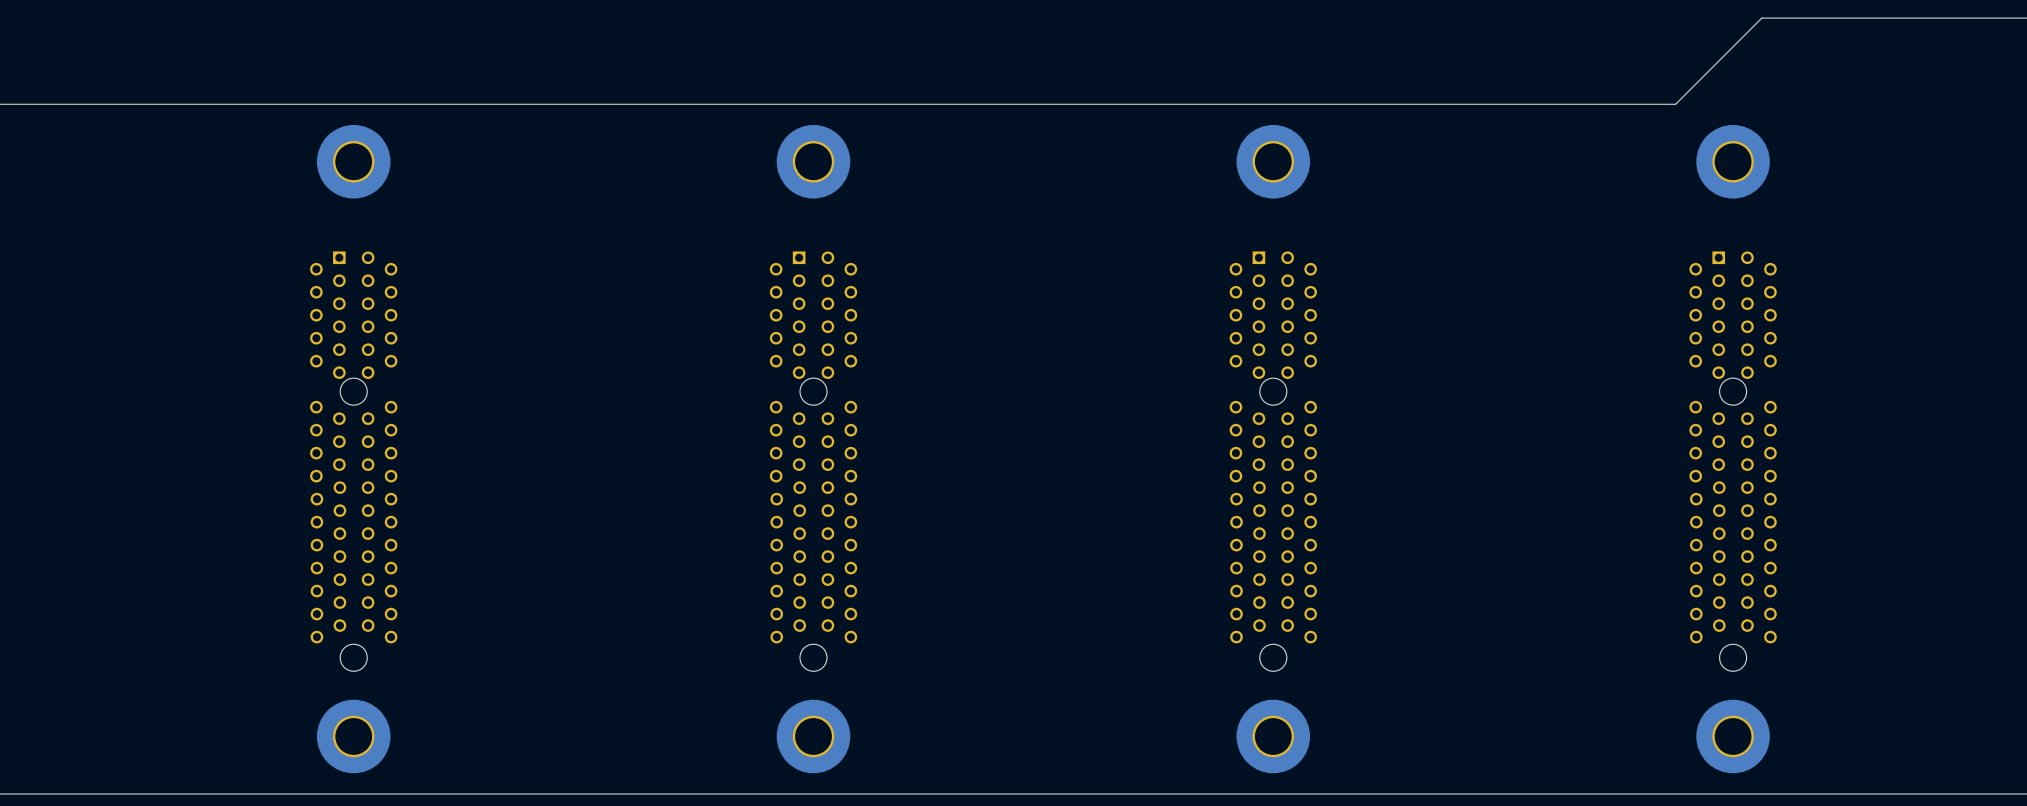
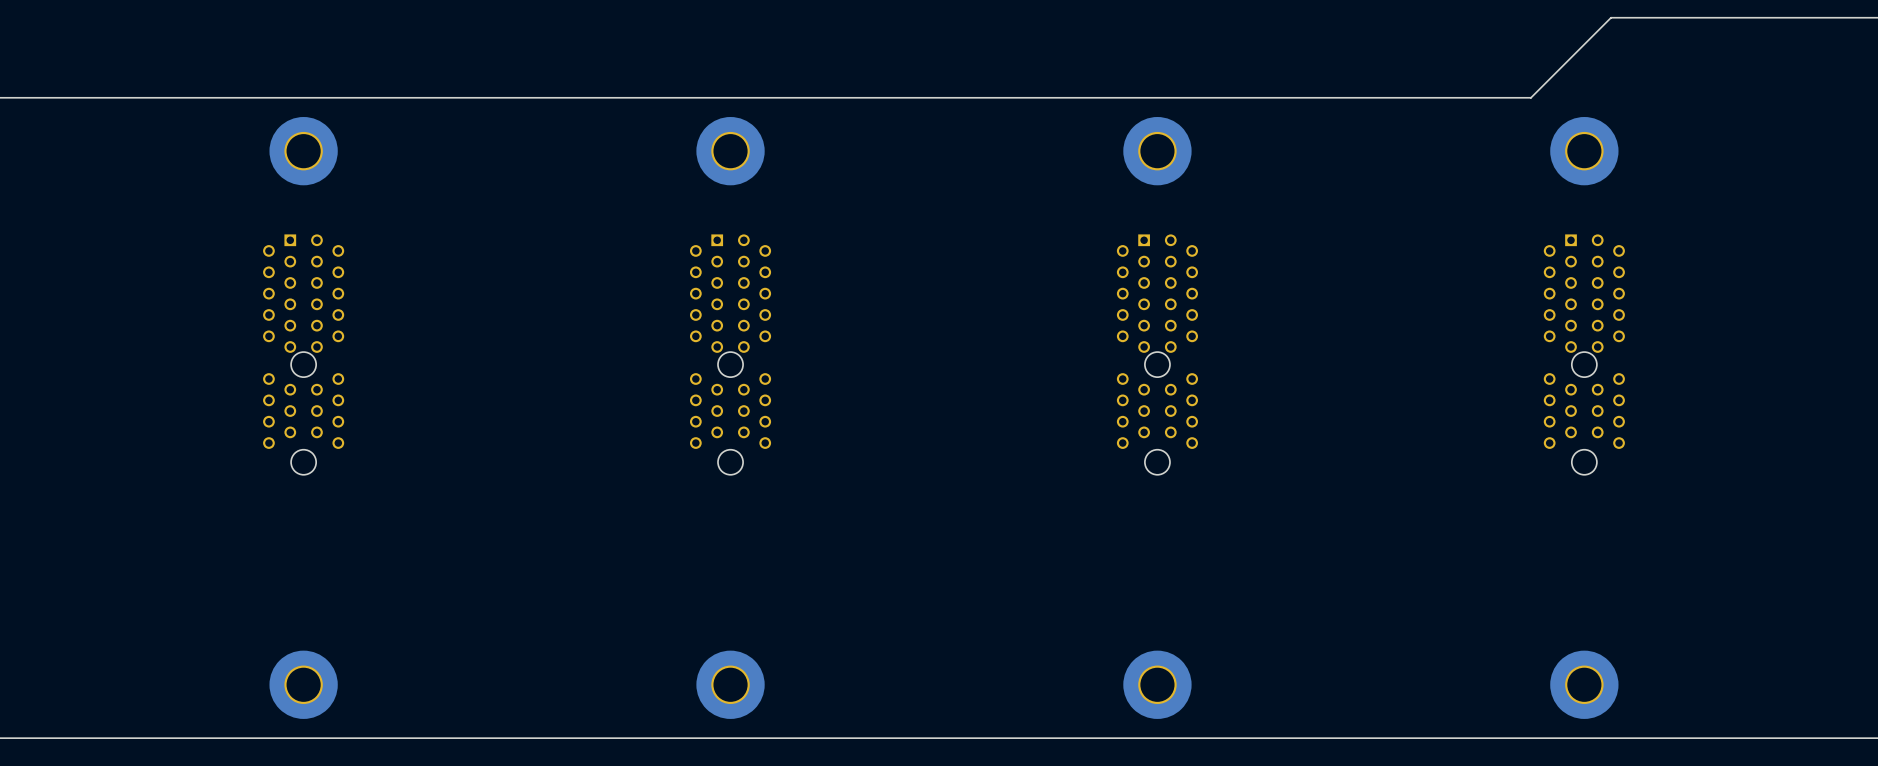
part: none -> (303, 354)
part: none -> (730, 354)
part: none -> (1157, 354)
part: none -> (1584, 354)
part: (353, 461) -> none
part: (813, 461) -> none
part: (1273, 461) -> none
part: (1733, 461) -> none

